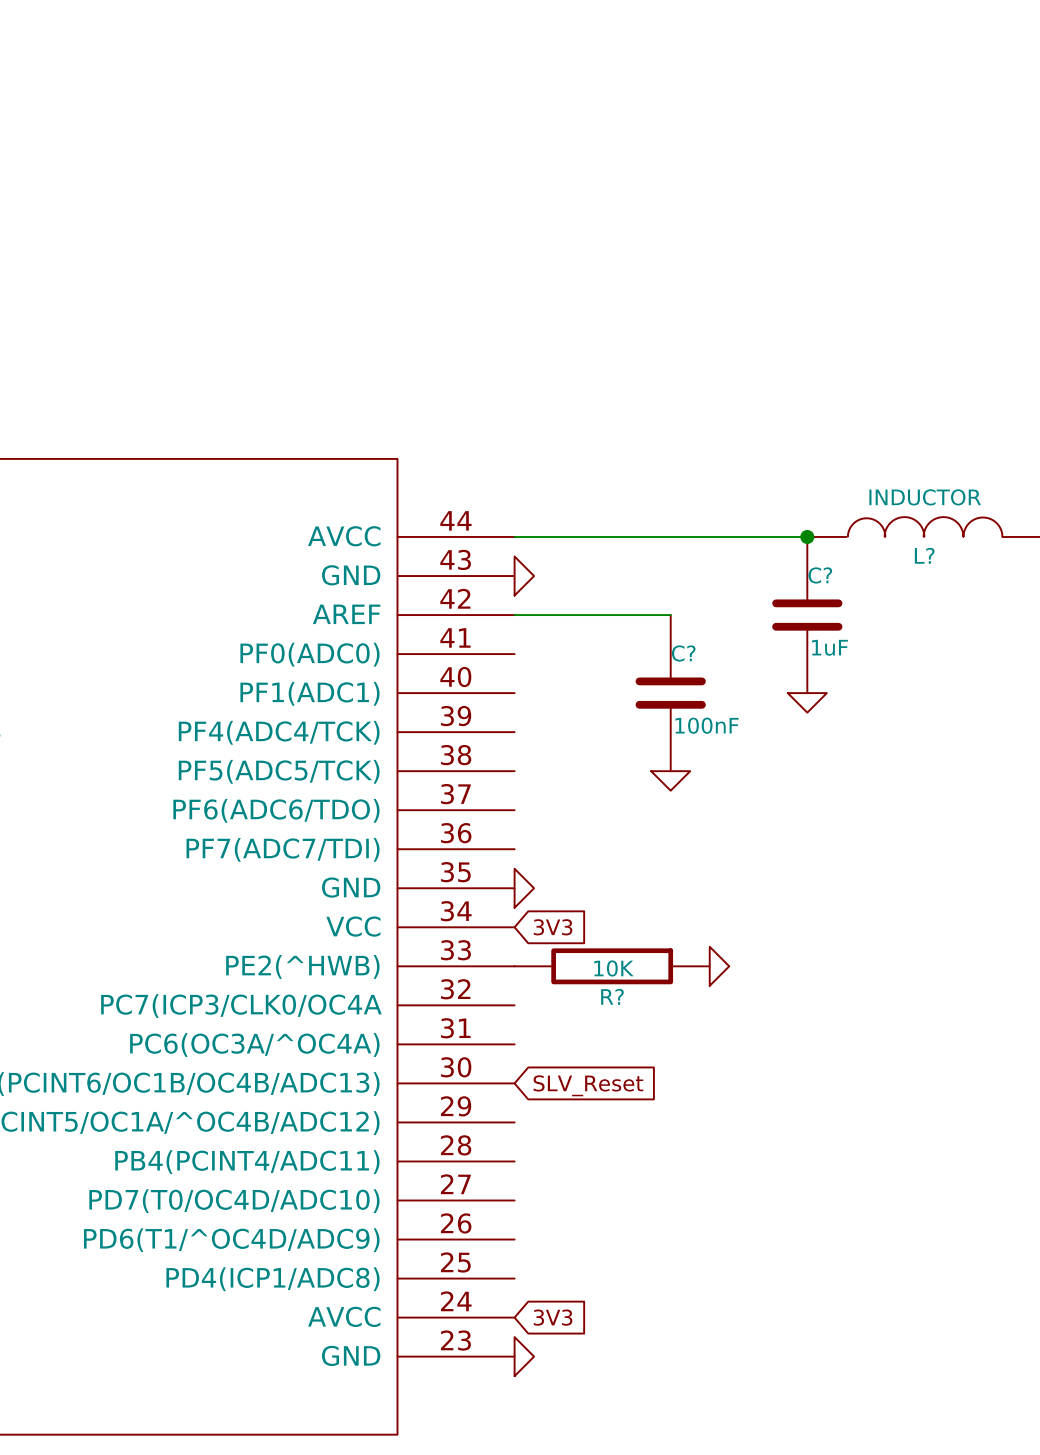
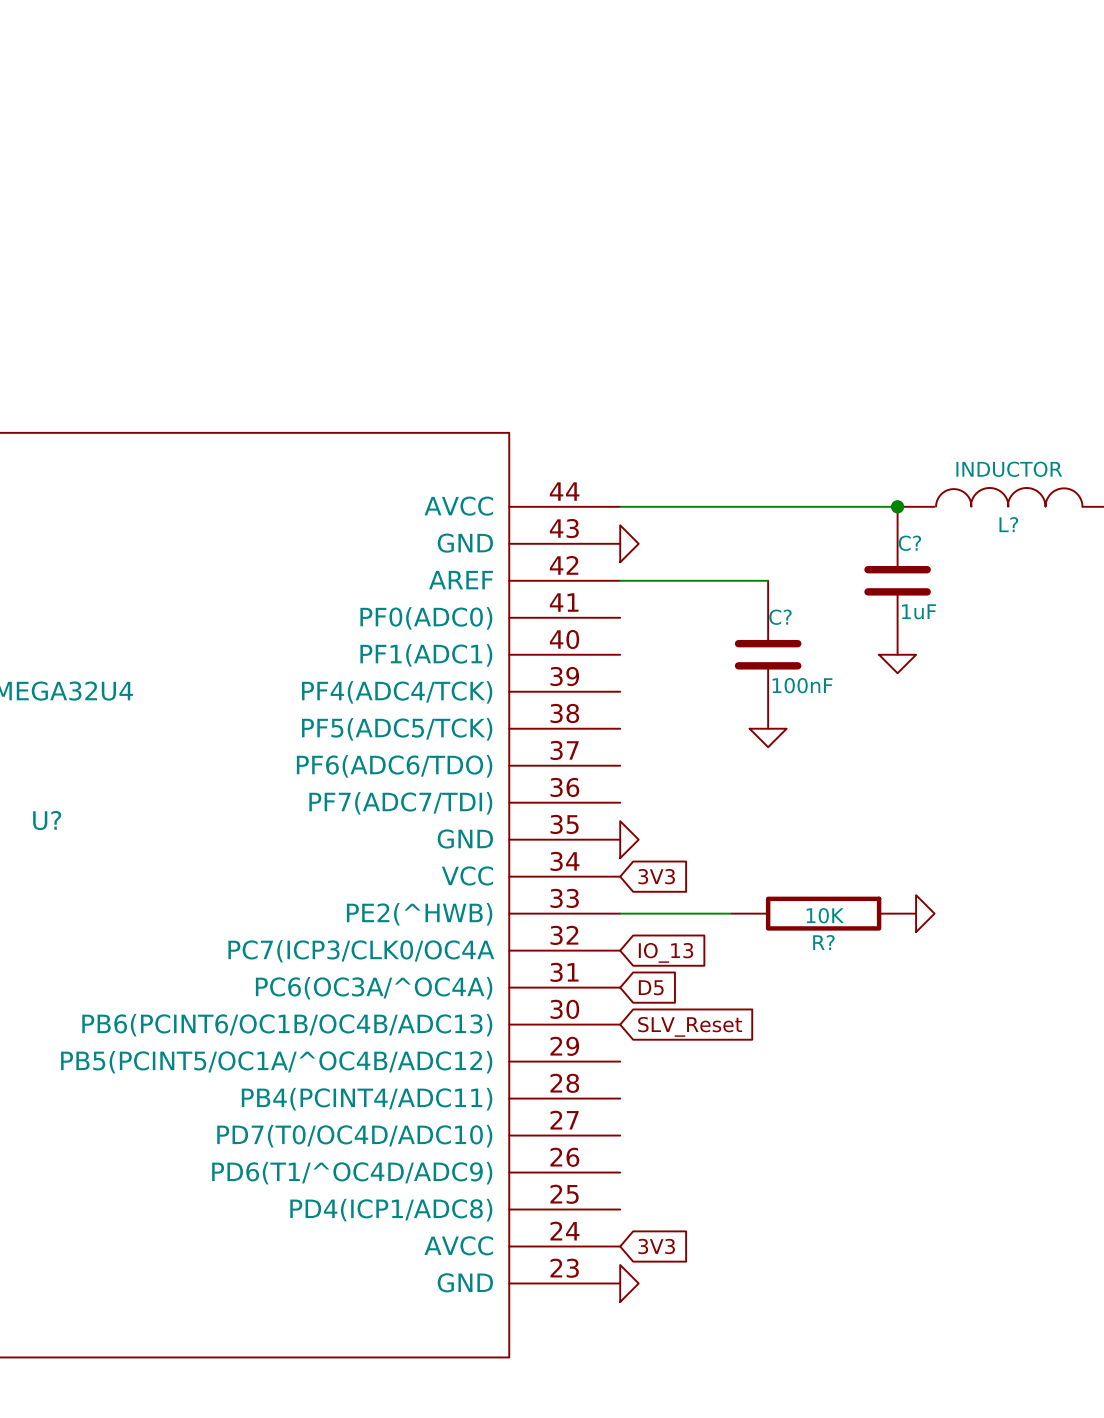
wire: none -> (620, 913) (731, 913)
R? position: (612, 966) -> (823, 913)
power symbol position: (719, 966) -> (925, 913)
global label: none -> IO_13 (665, 952)
global label: none -> D5 (651, 987)

